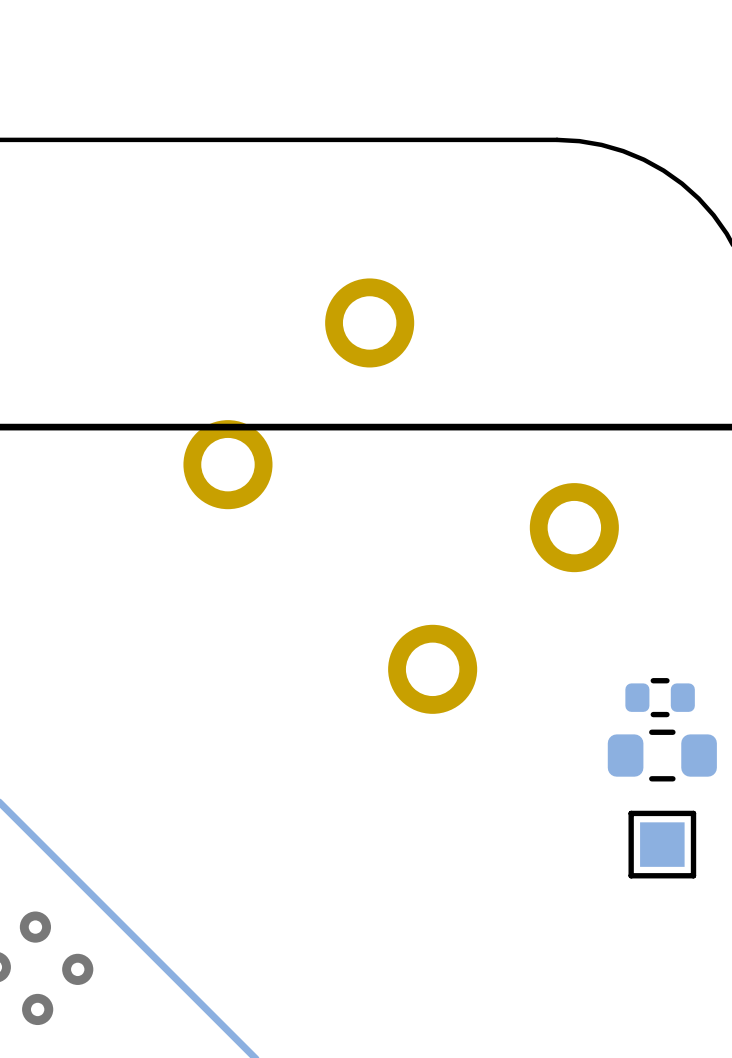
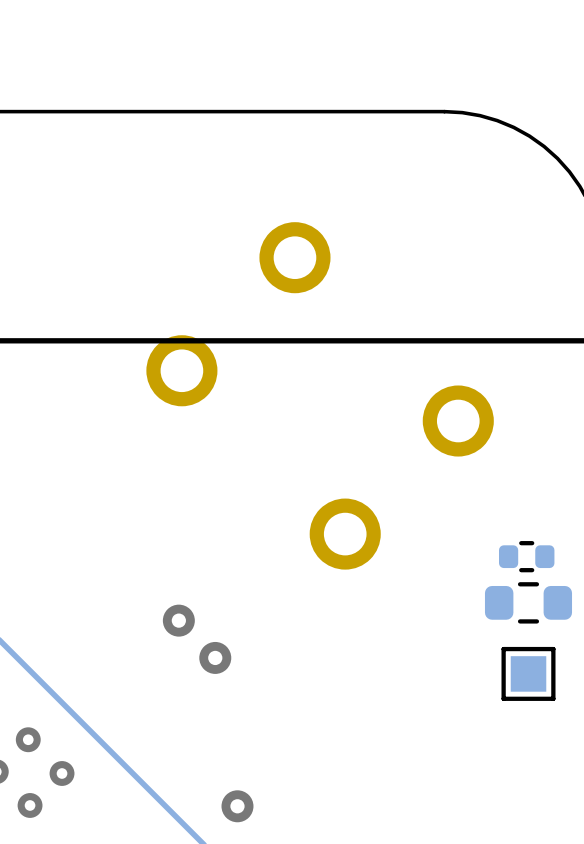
via: none -> (178, 620)
via: none -> (215, 657)
via: none -> (237, 806)

